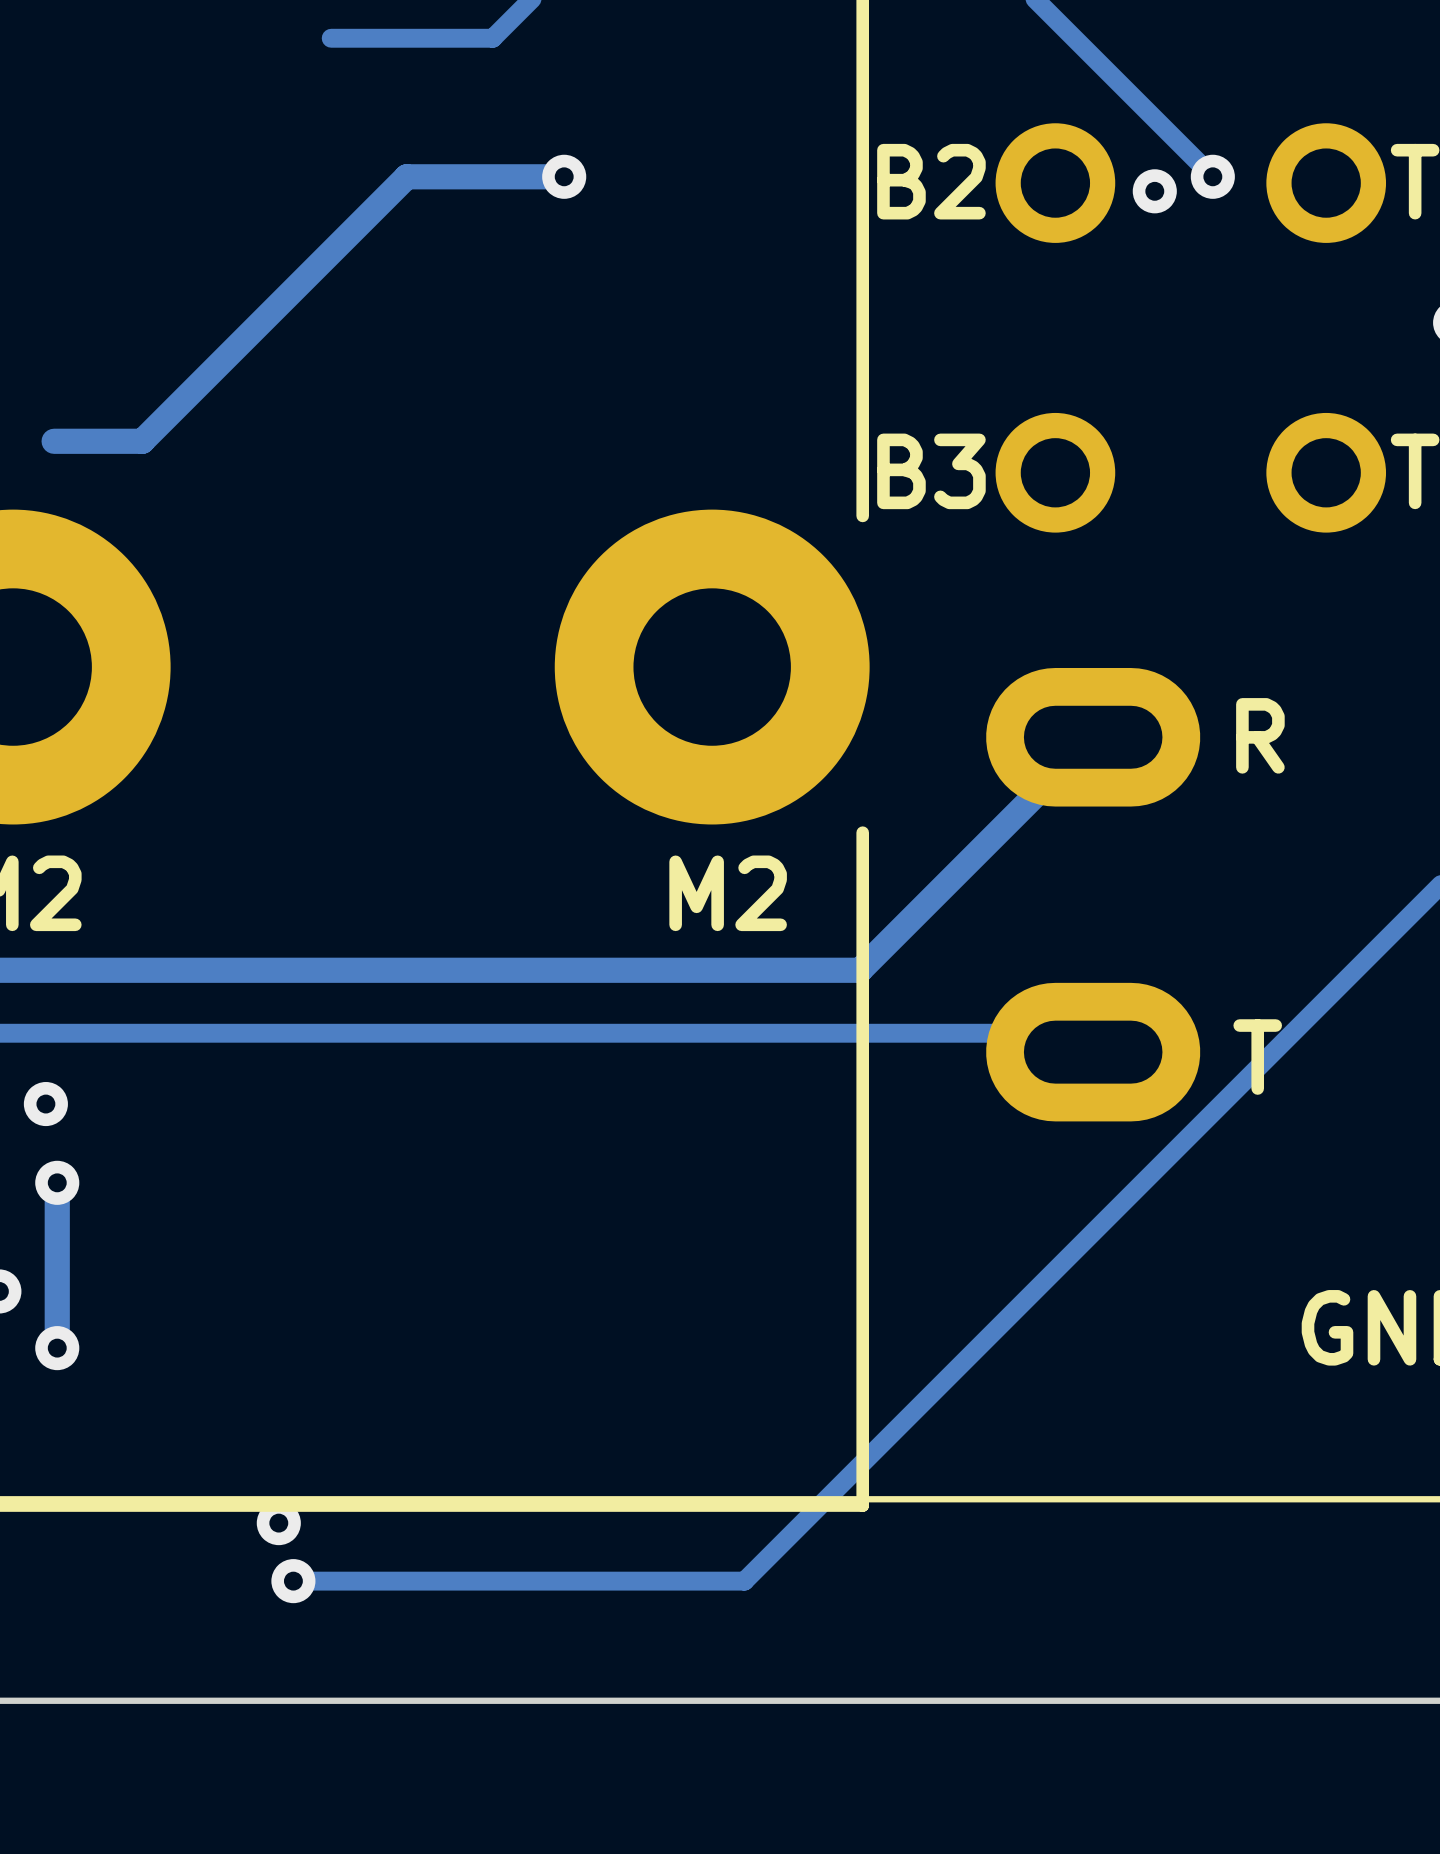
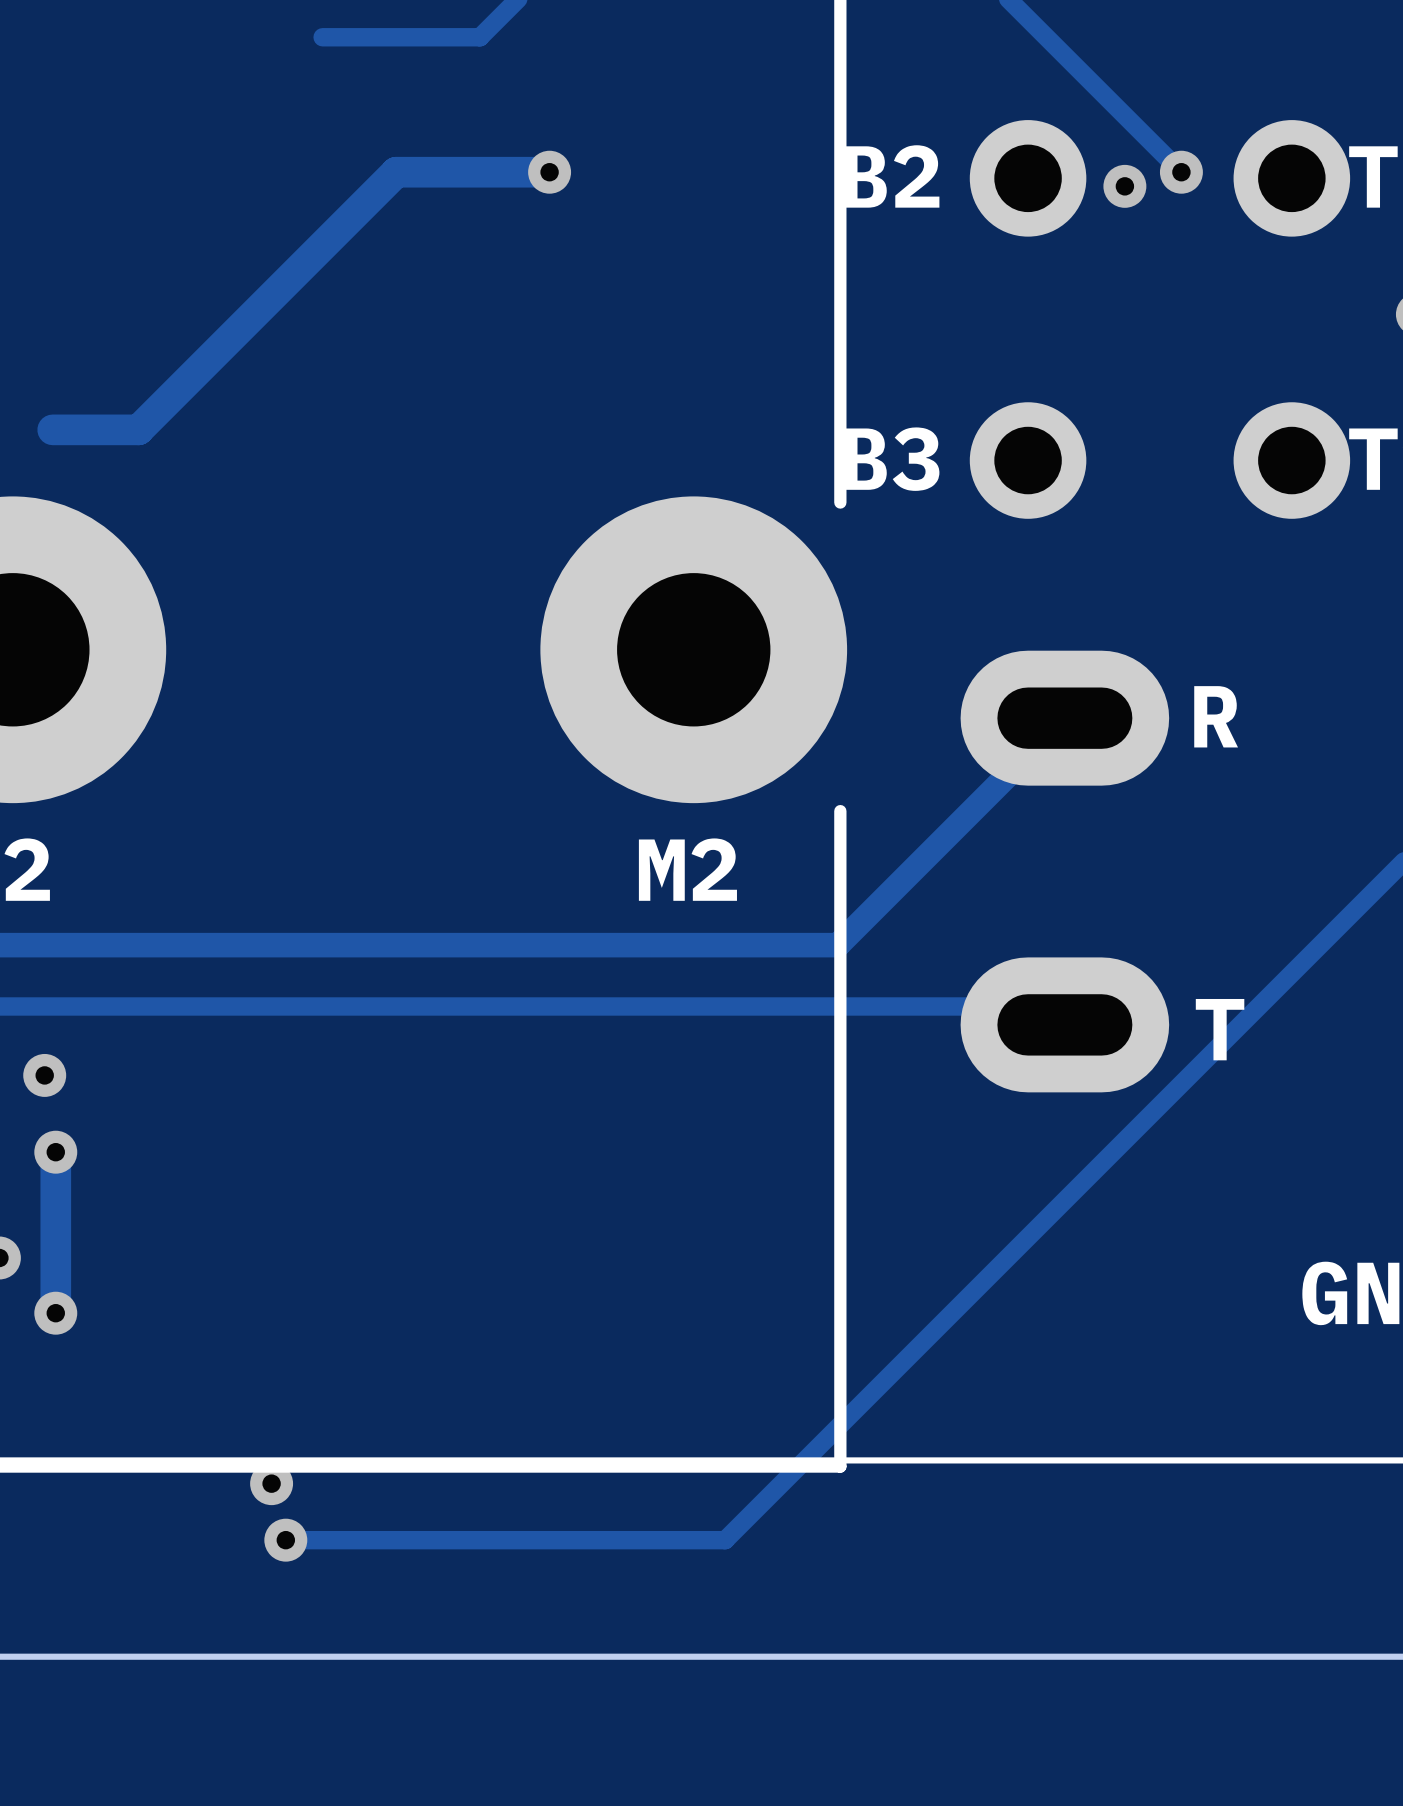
track width: thin (564, 176) (406, 176) (142, 441) (54, 441) -> thick (549, 172) (396, 172) (138, 429) (52, 429)
track width: thin (57, 1182) (57, 1348) -> thick (55, 1152) (55, 1313)

